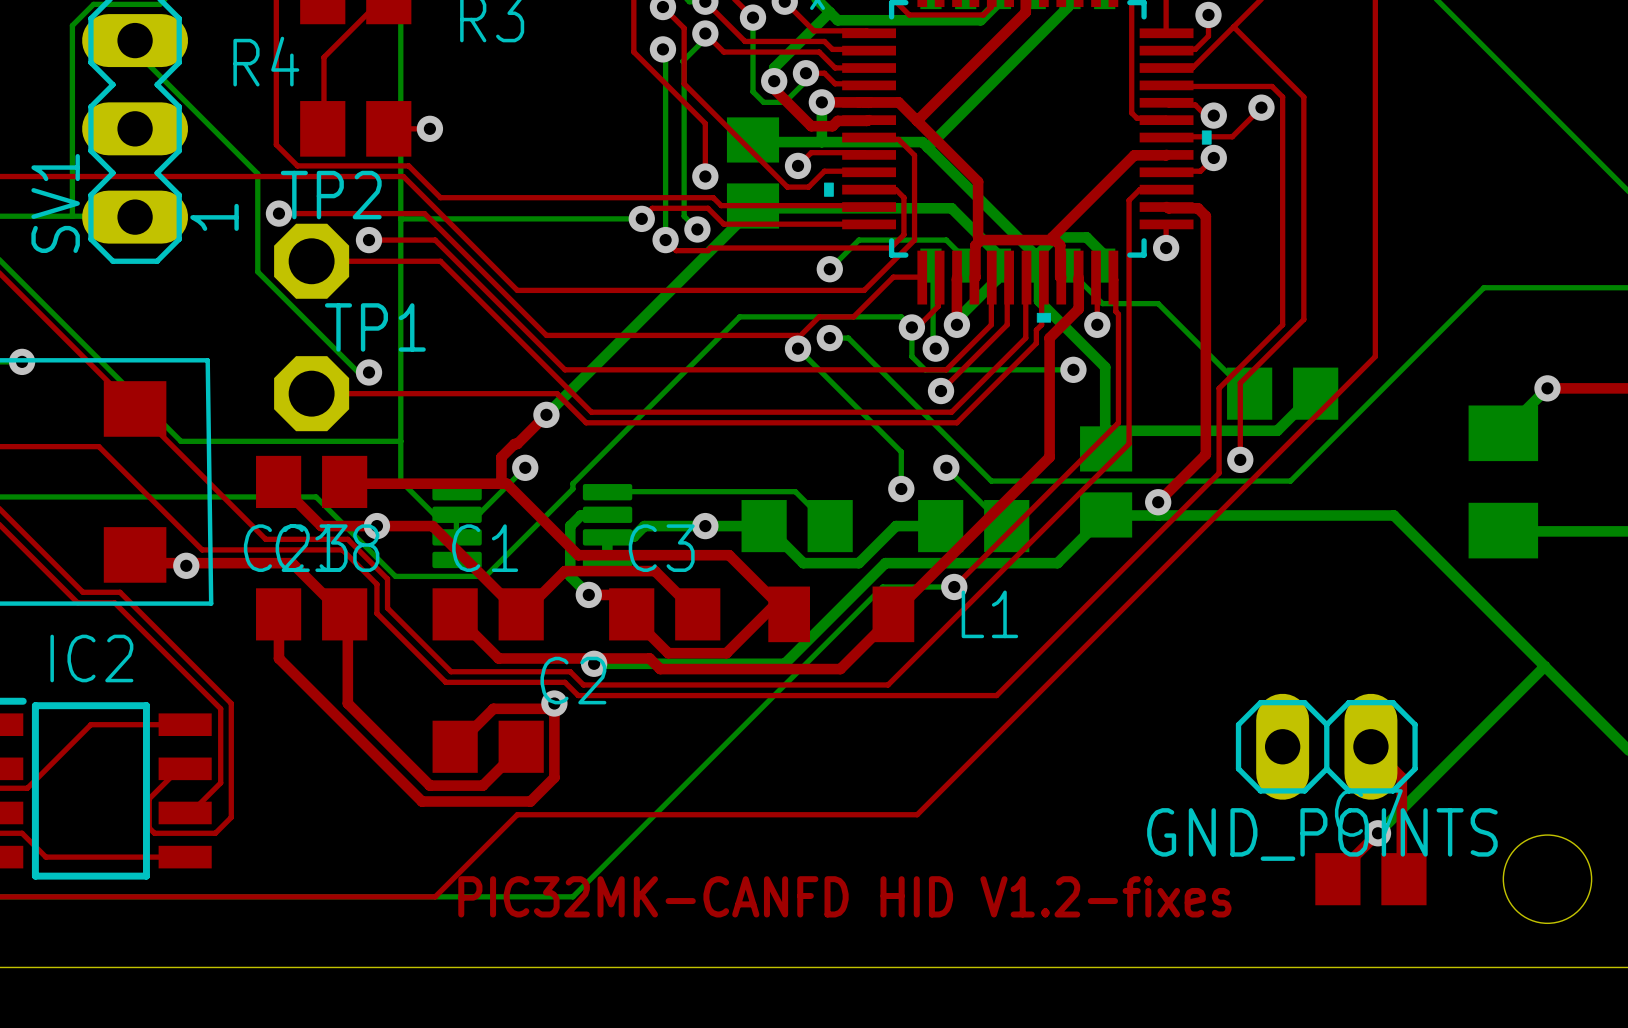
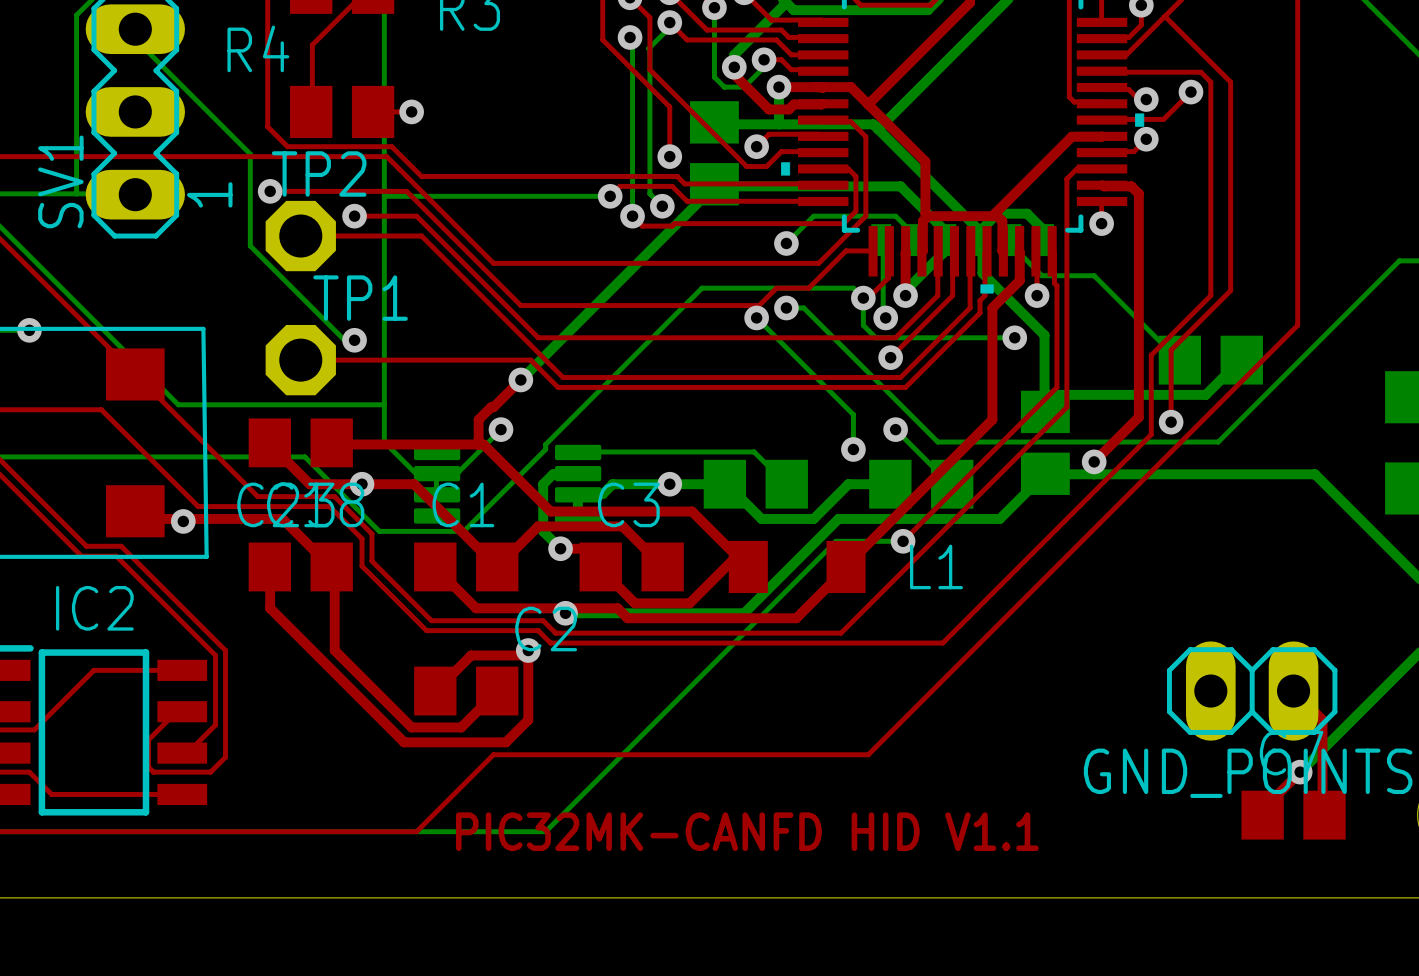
text: PIC32MK-CANFD HID V1.2-fixes (844, 896) -> PIC32MK-CANFD HID V1.1 (747, 831)

